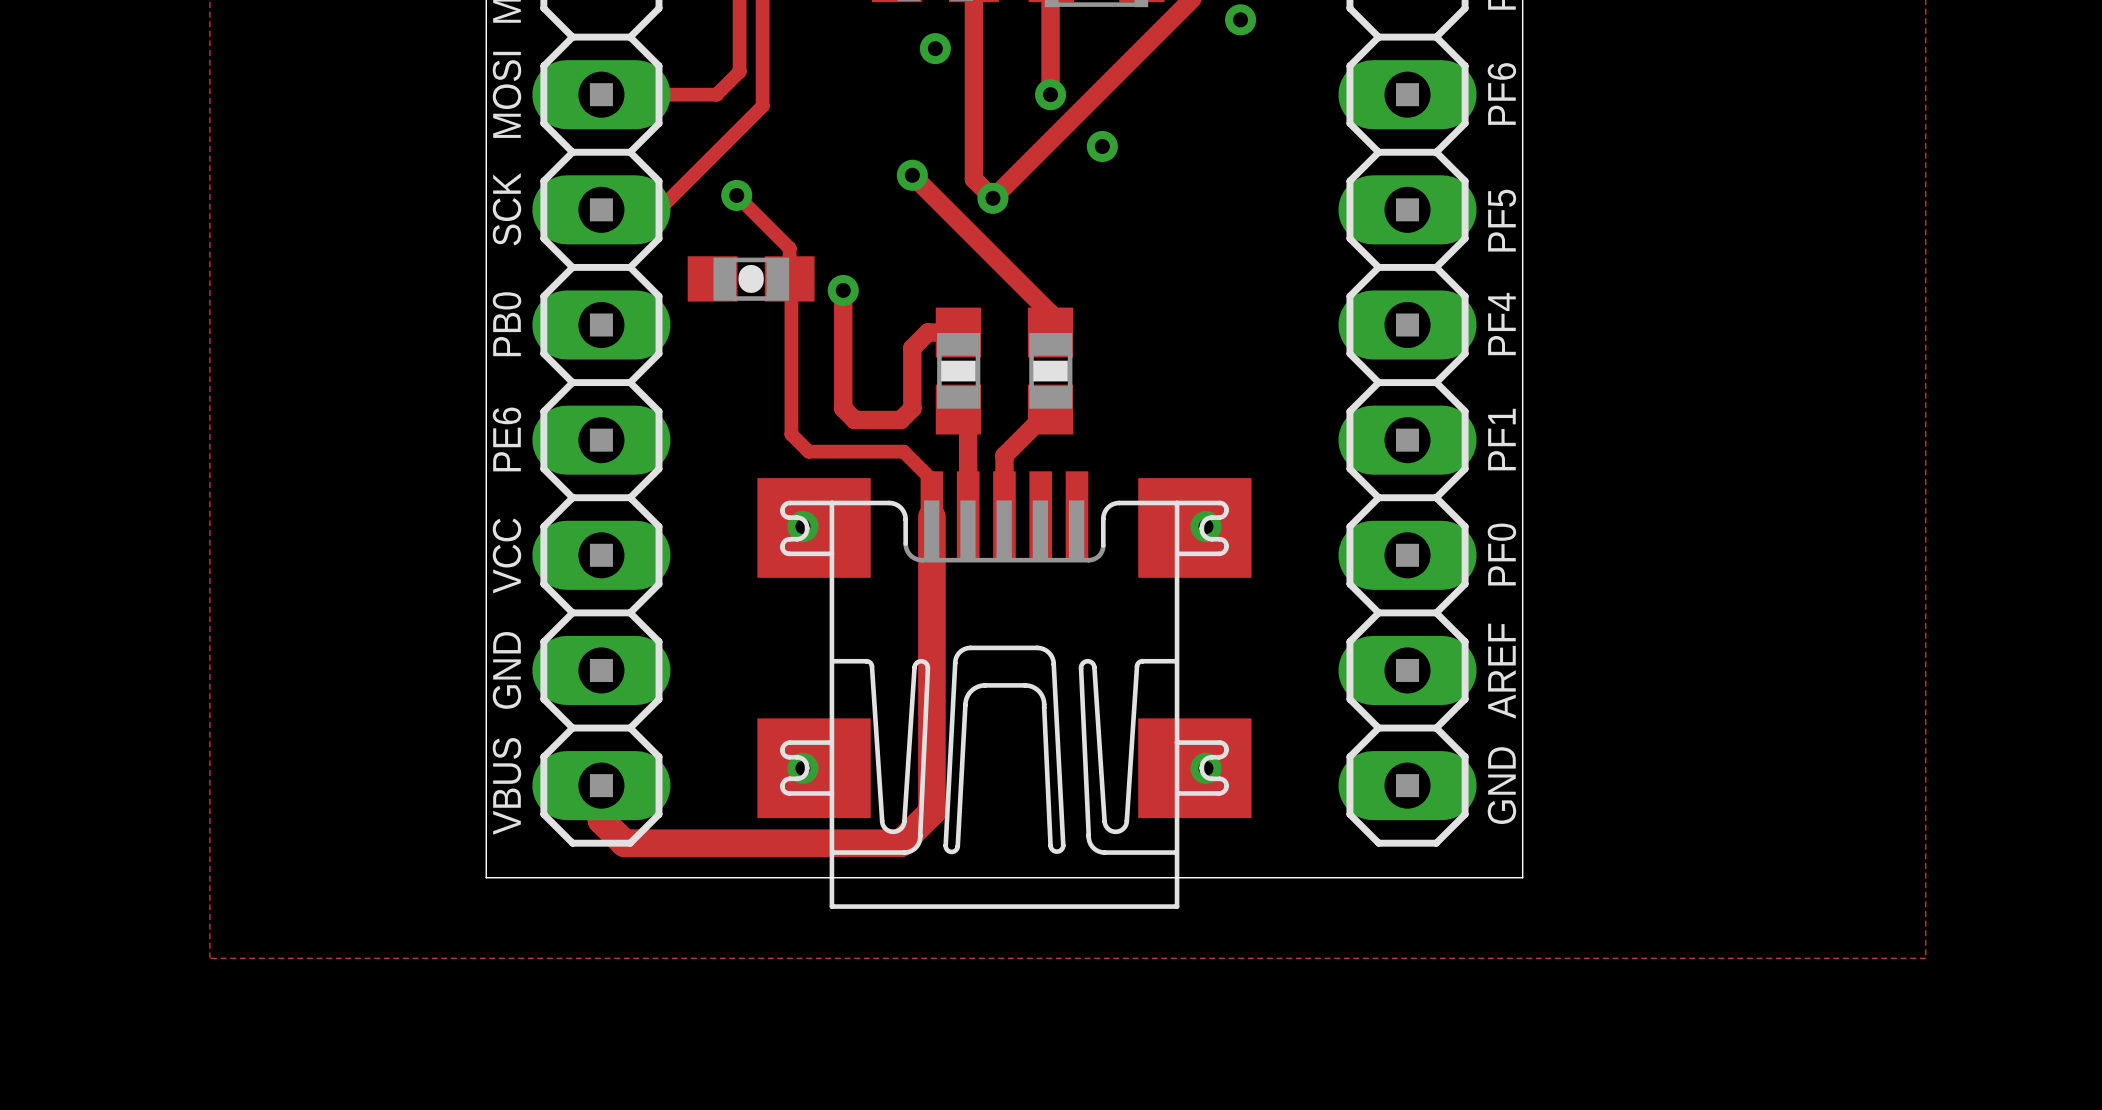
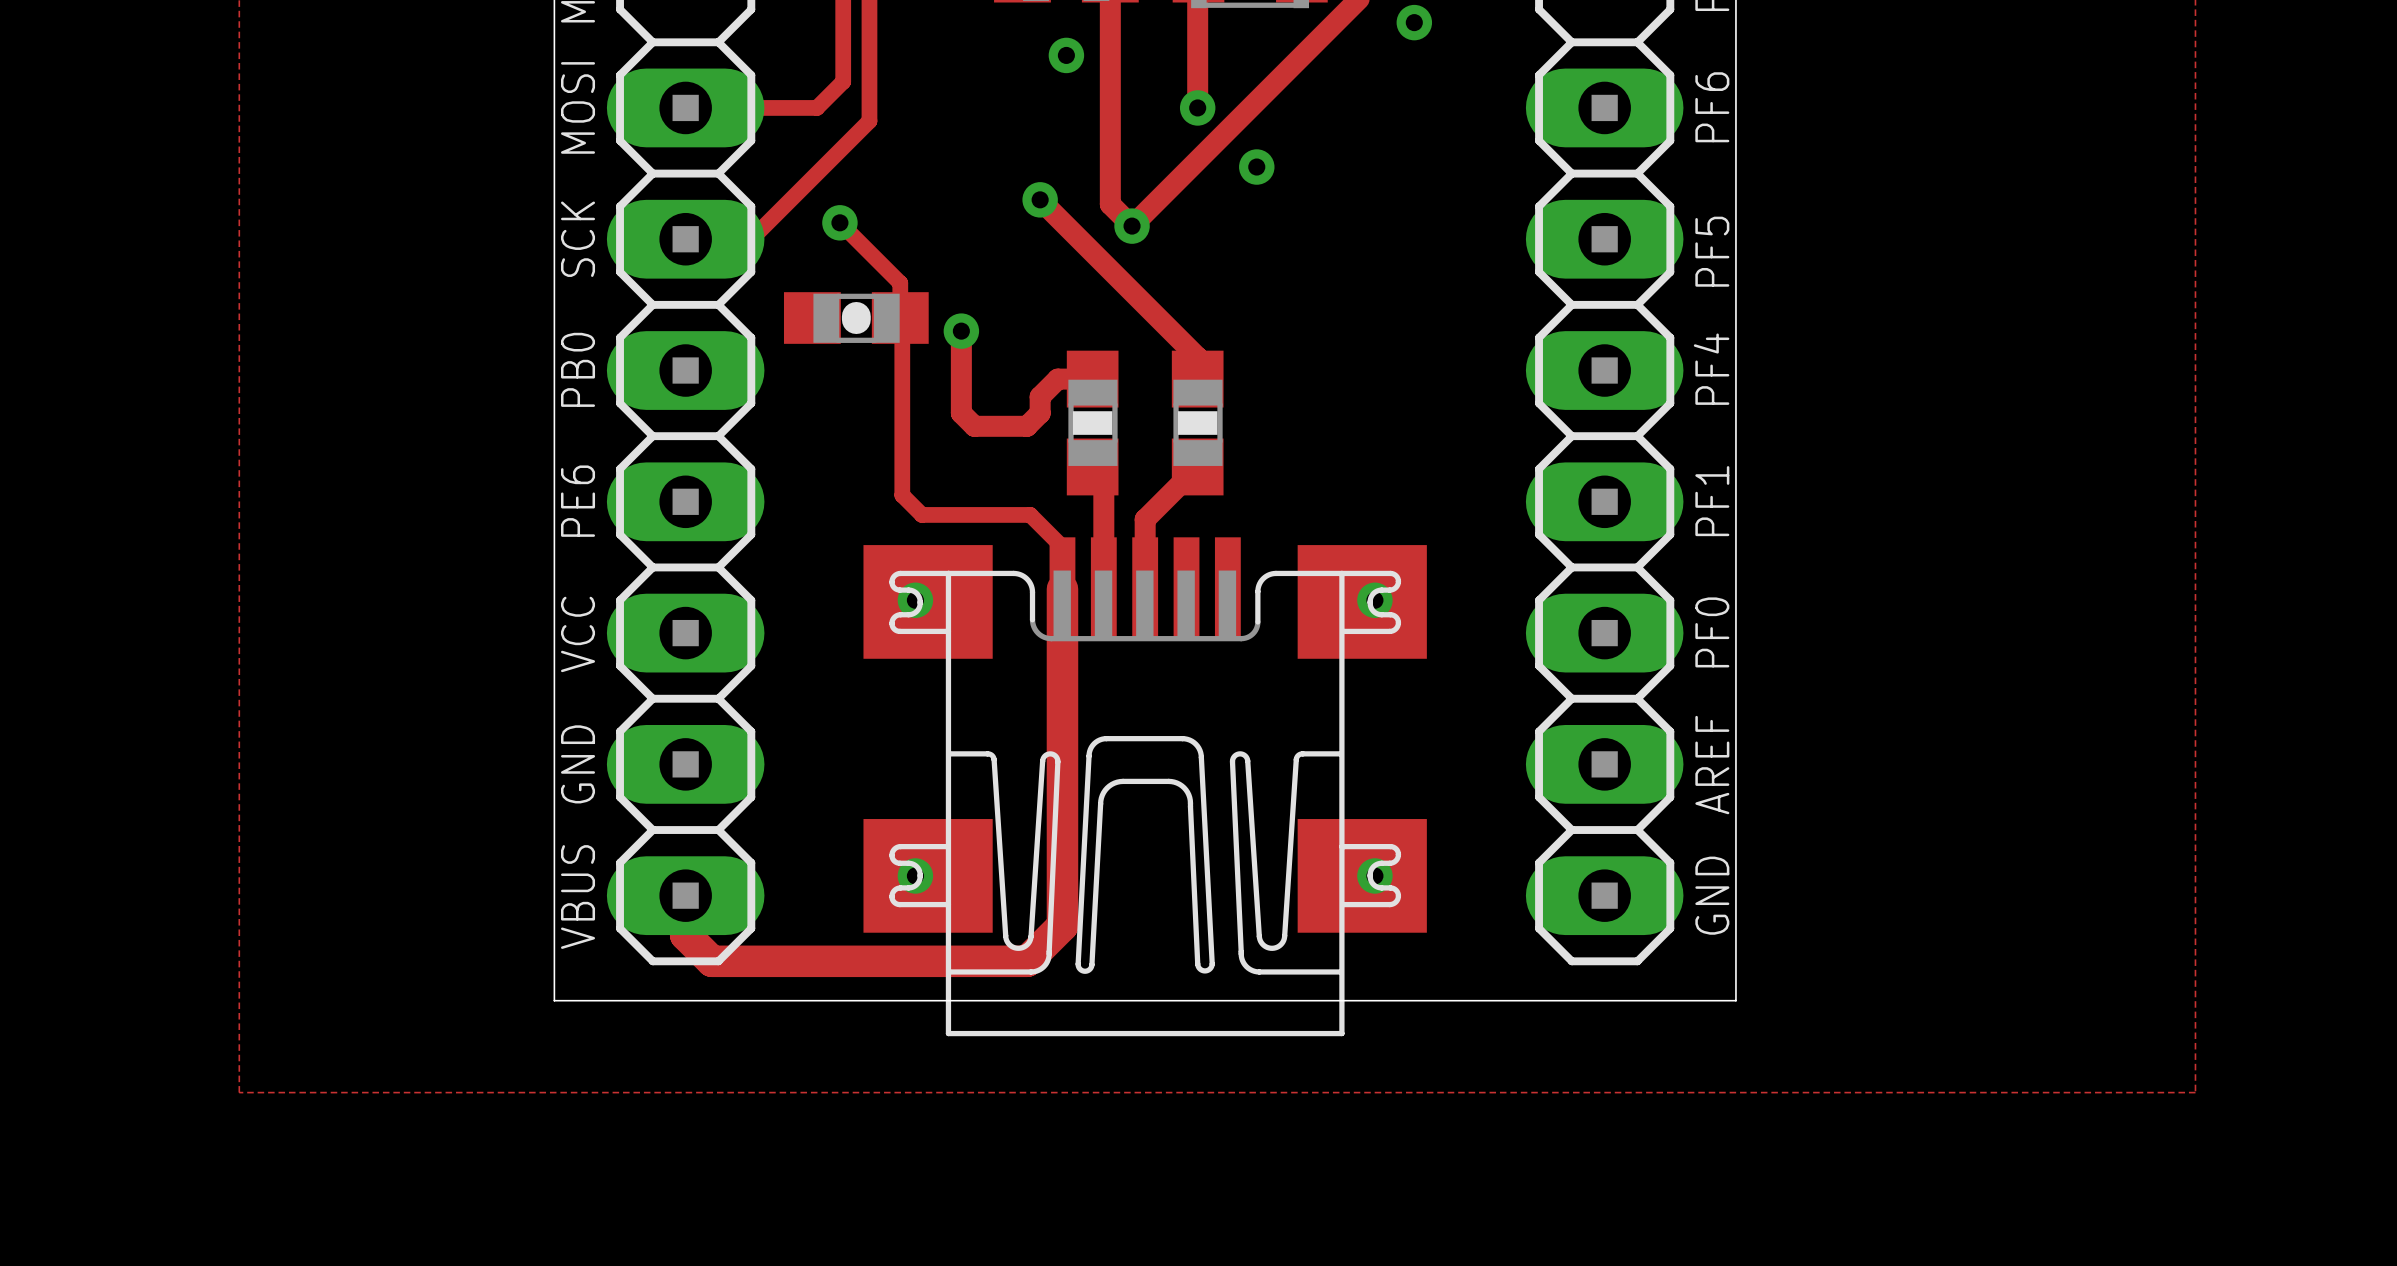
track: (843, 362) (843, 408) (854, 420) (900, 420) (912, 408) (912, 362) -> (961, 413) (974, 426) (1027, 426) (1040, 413)

